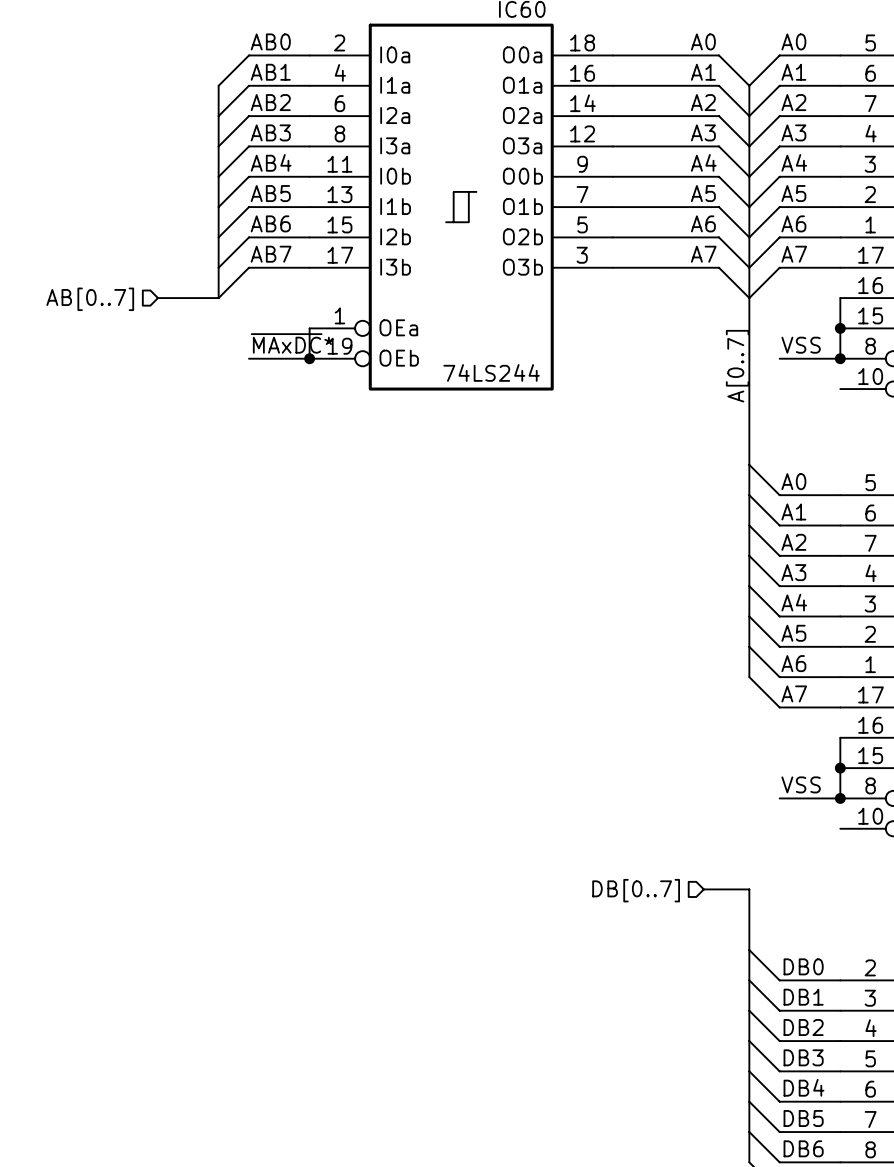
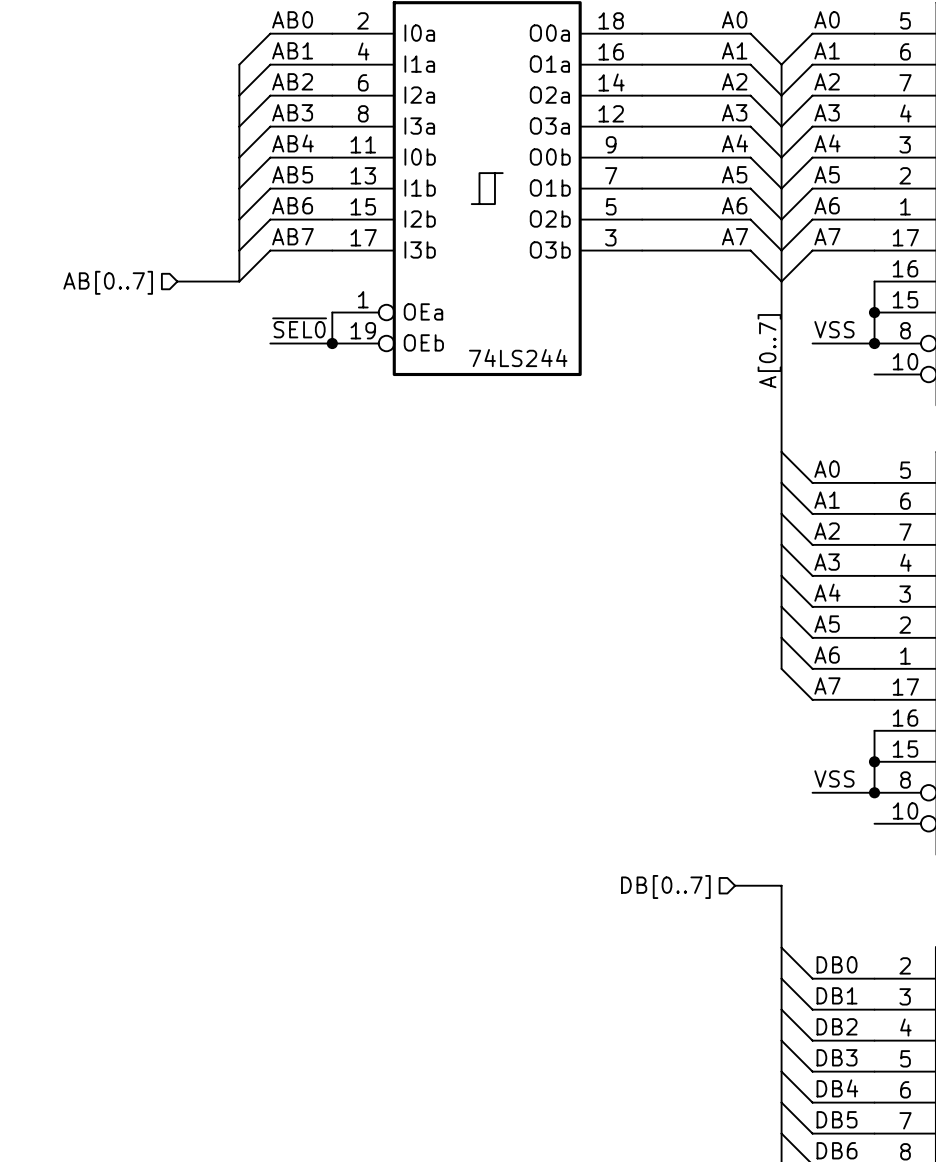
label: ~{MAxDC}* (292, 343) -> ~{SEL0} (299, 327)

